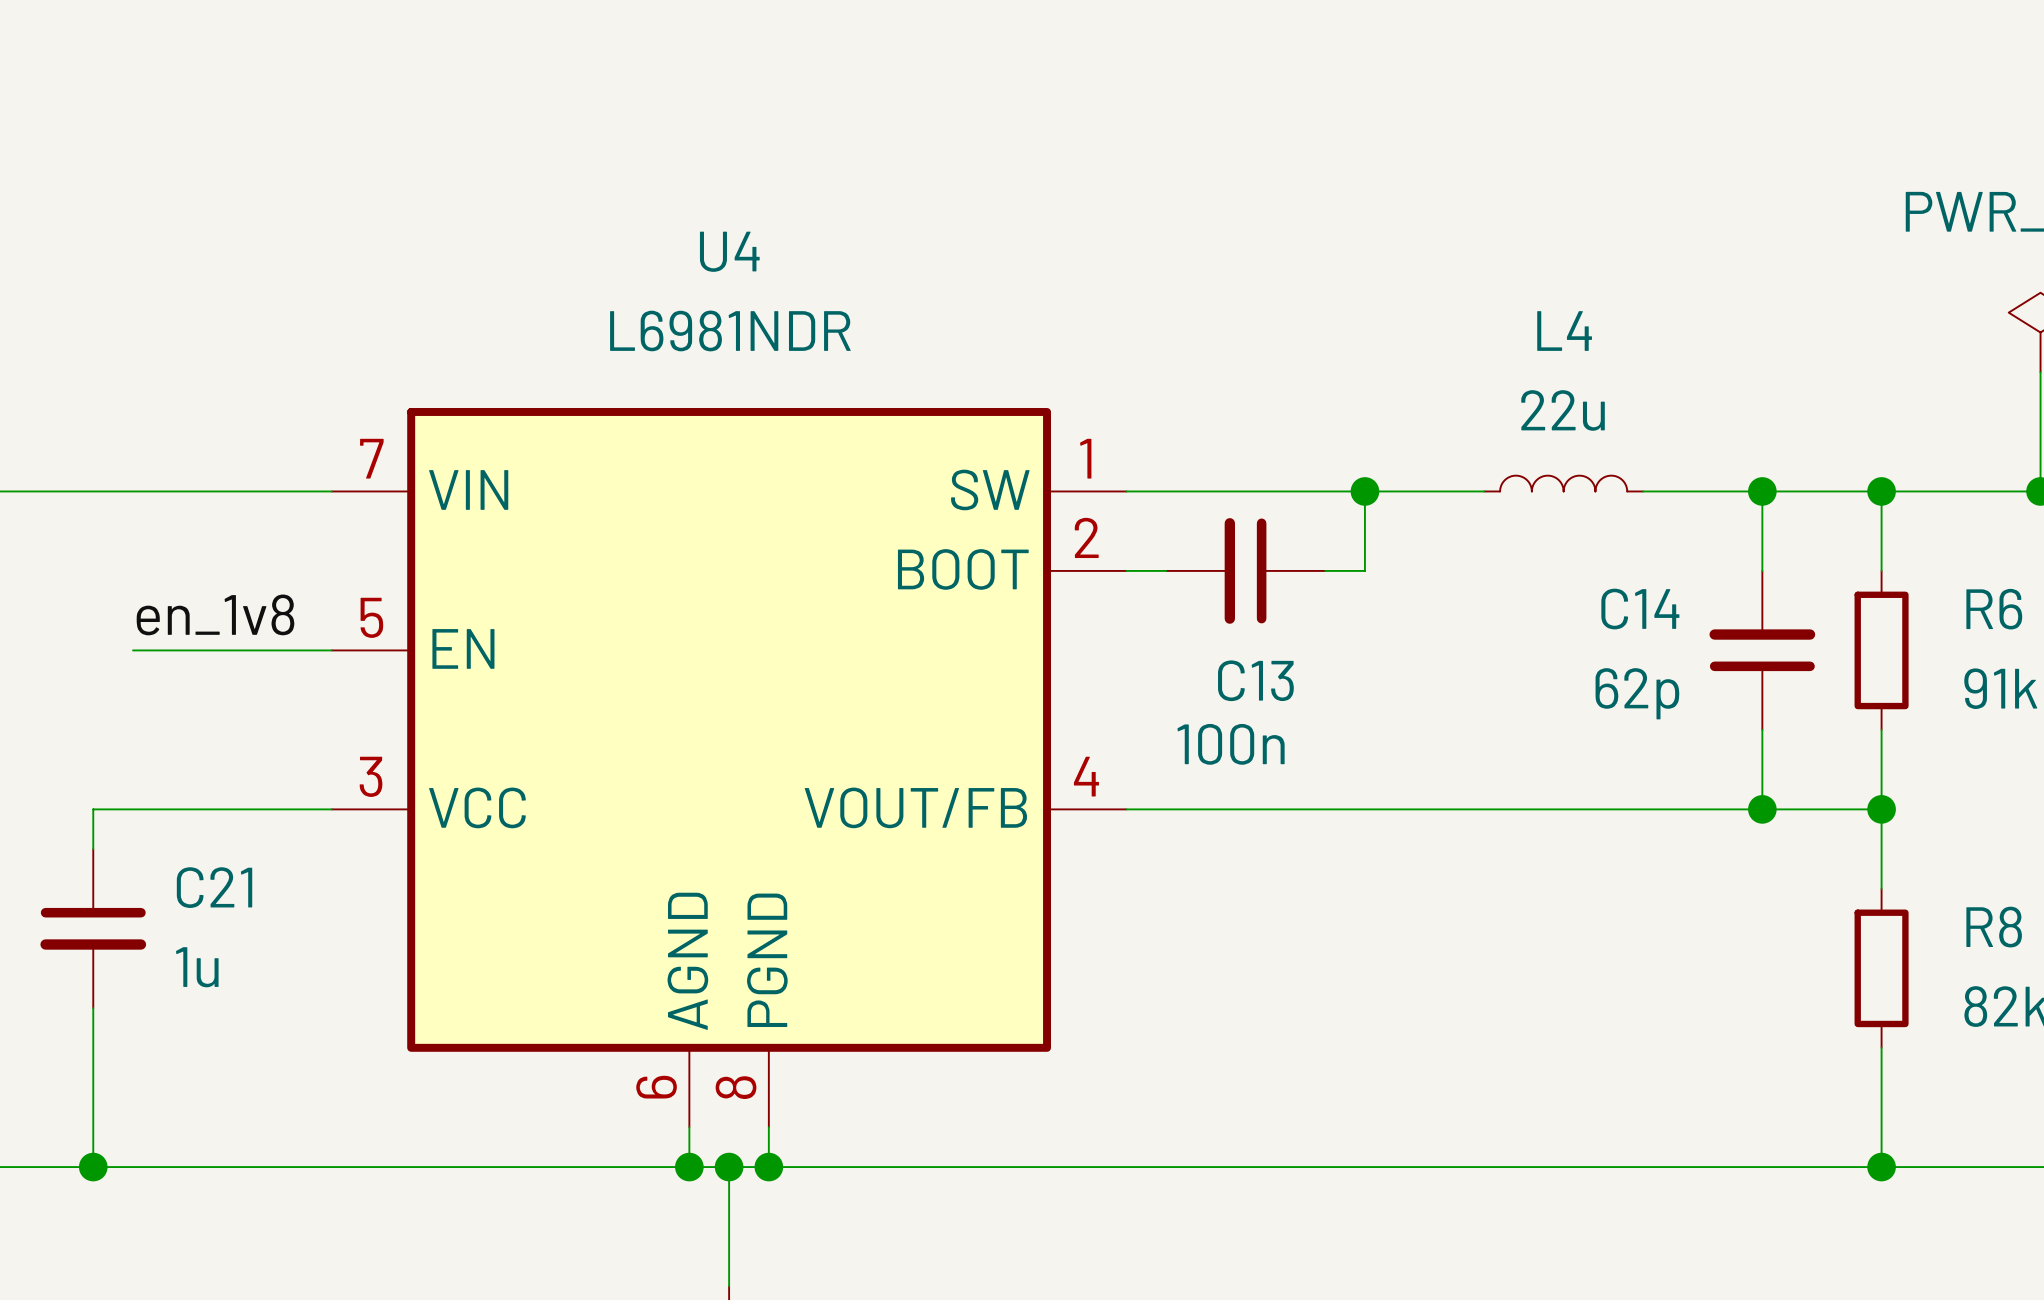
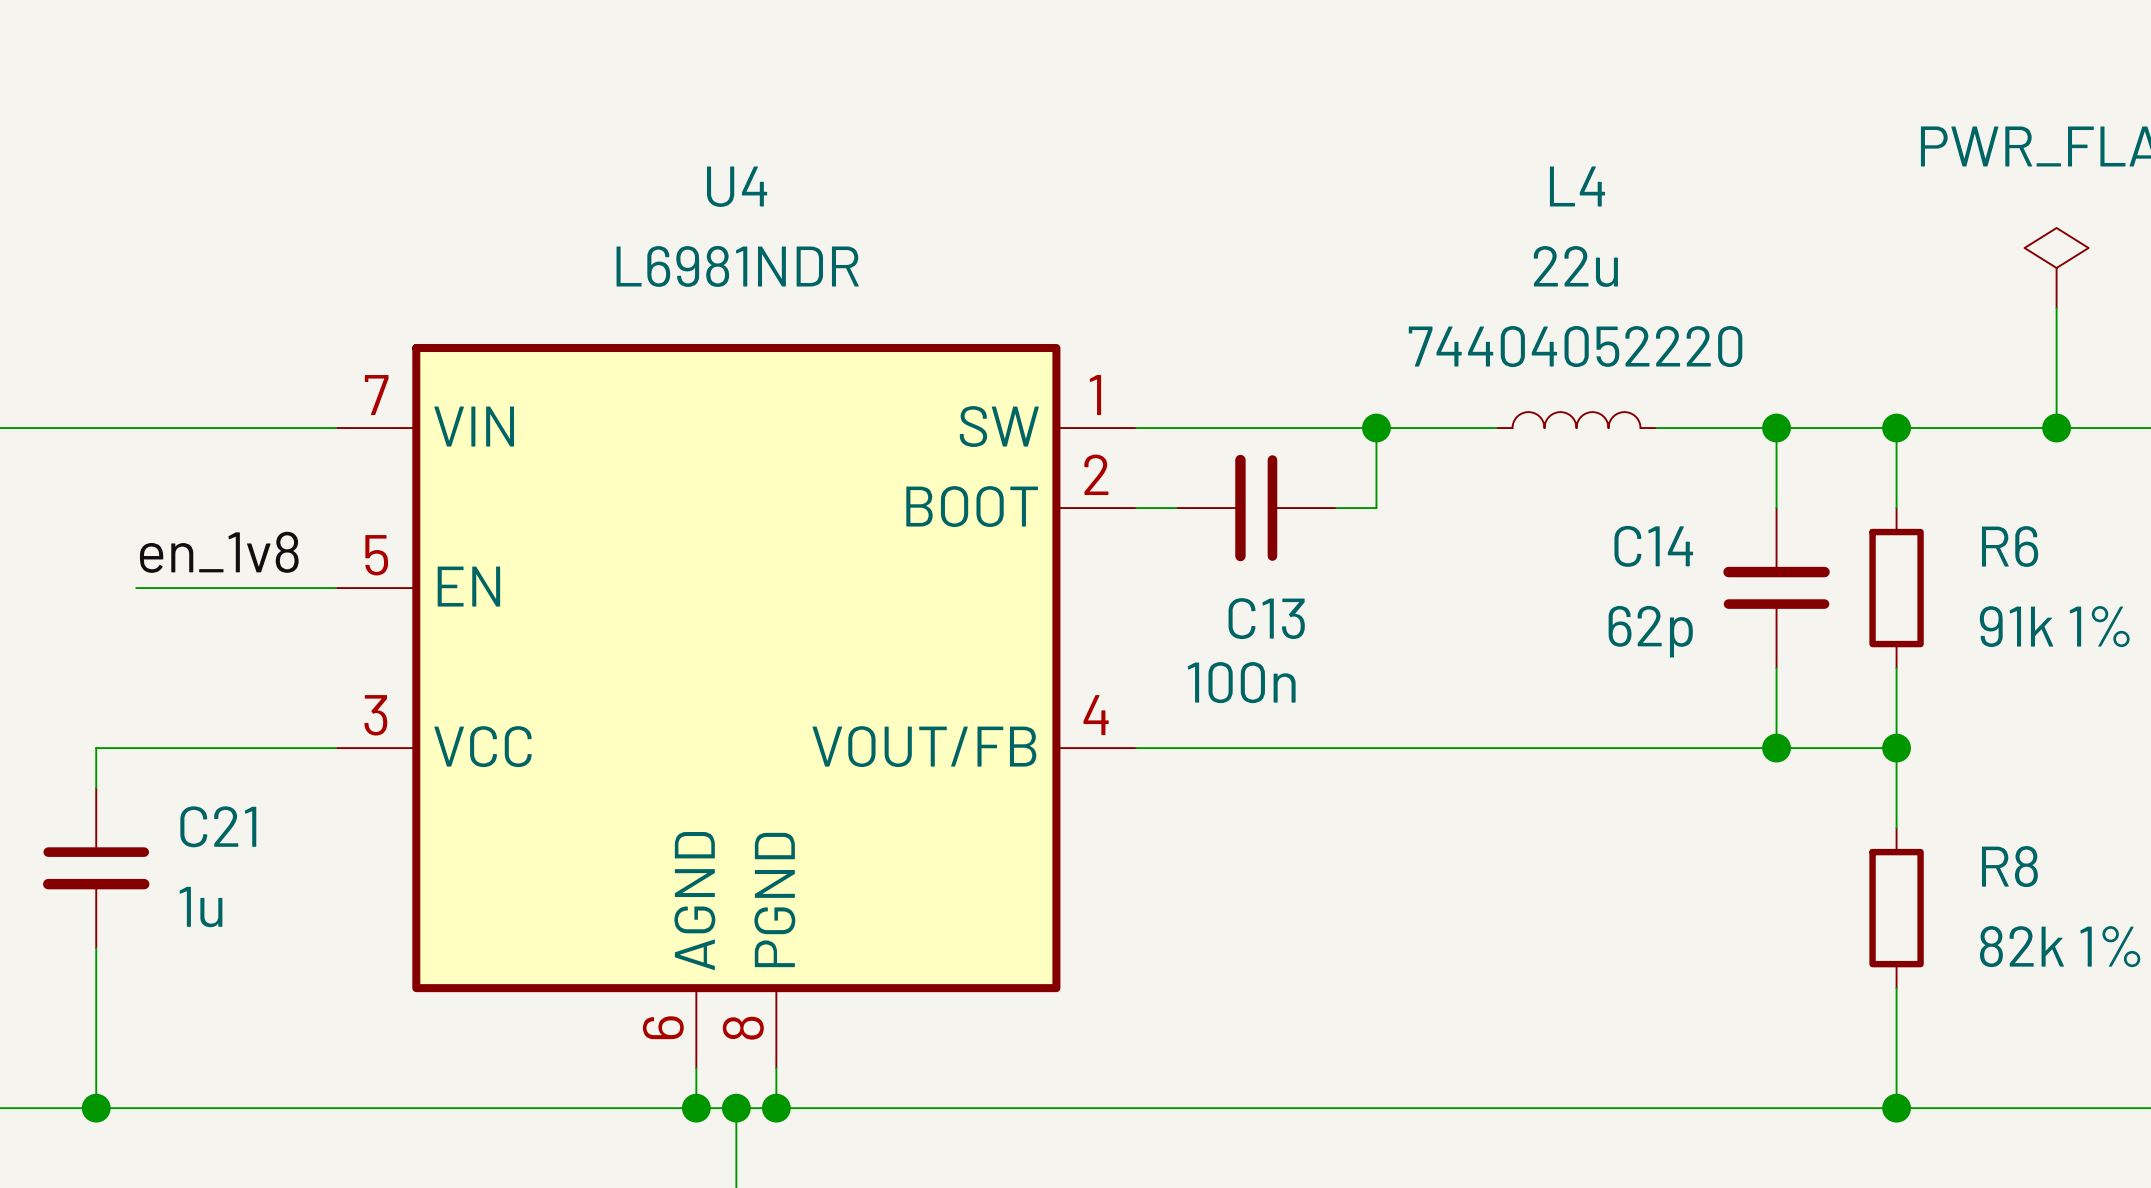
L4 name position: L4 (1564, 331) -> L4 (1577, 186)
L4 text: none -> 74404052220 (1575, 346)
L4 value position: 22u (1563, 410) -> 22u (1575, 266)

